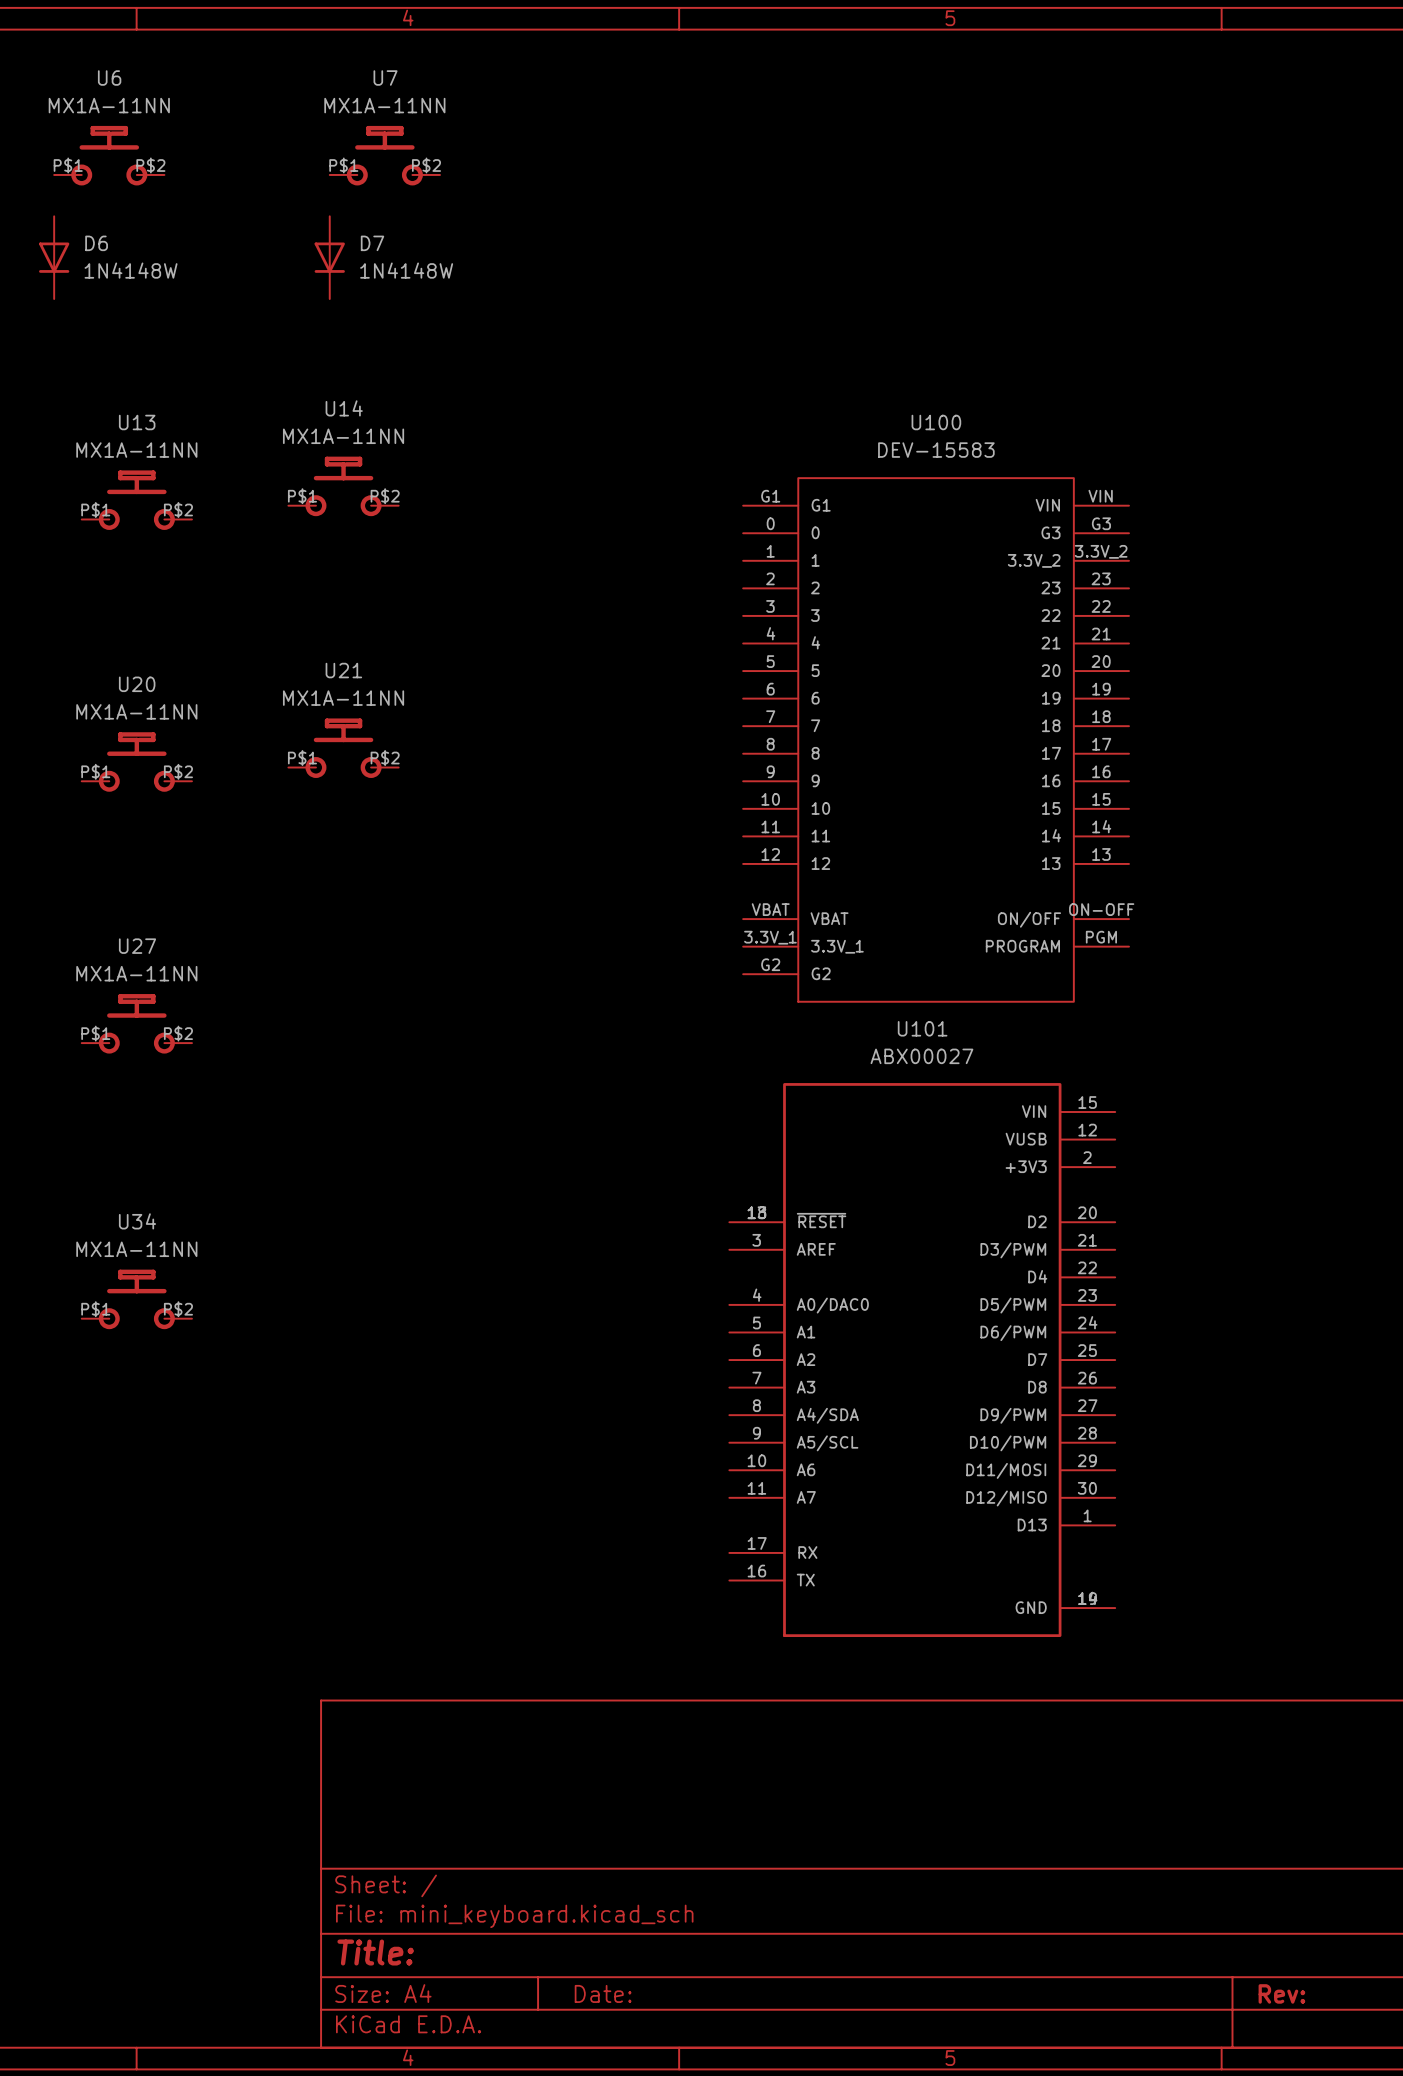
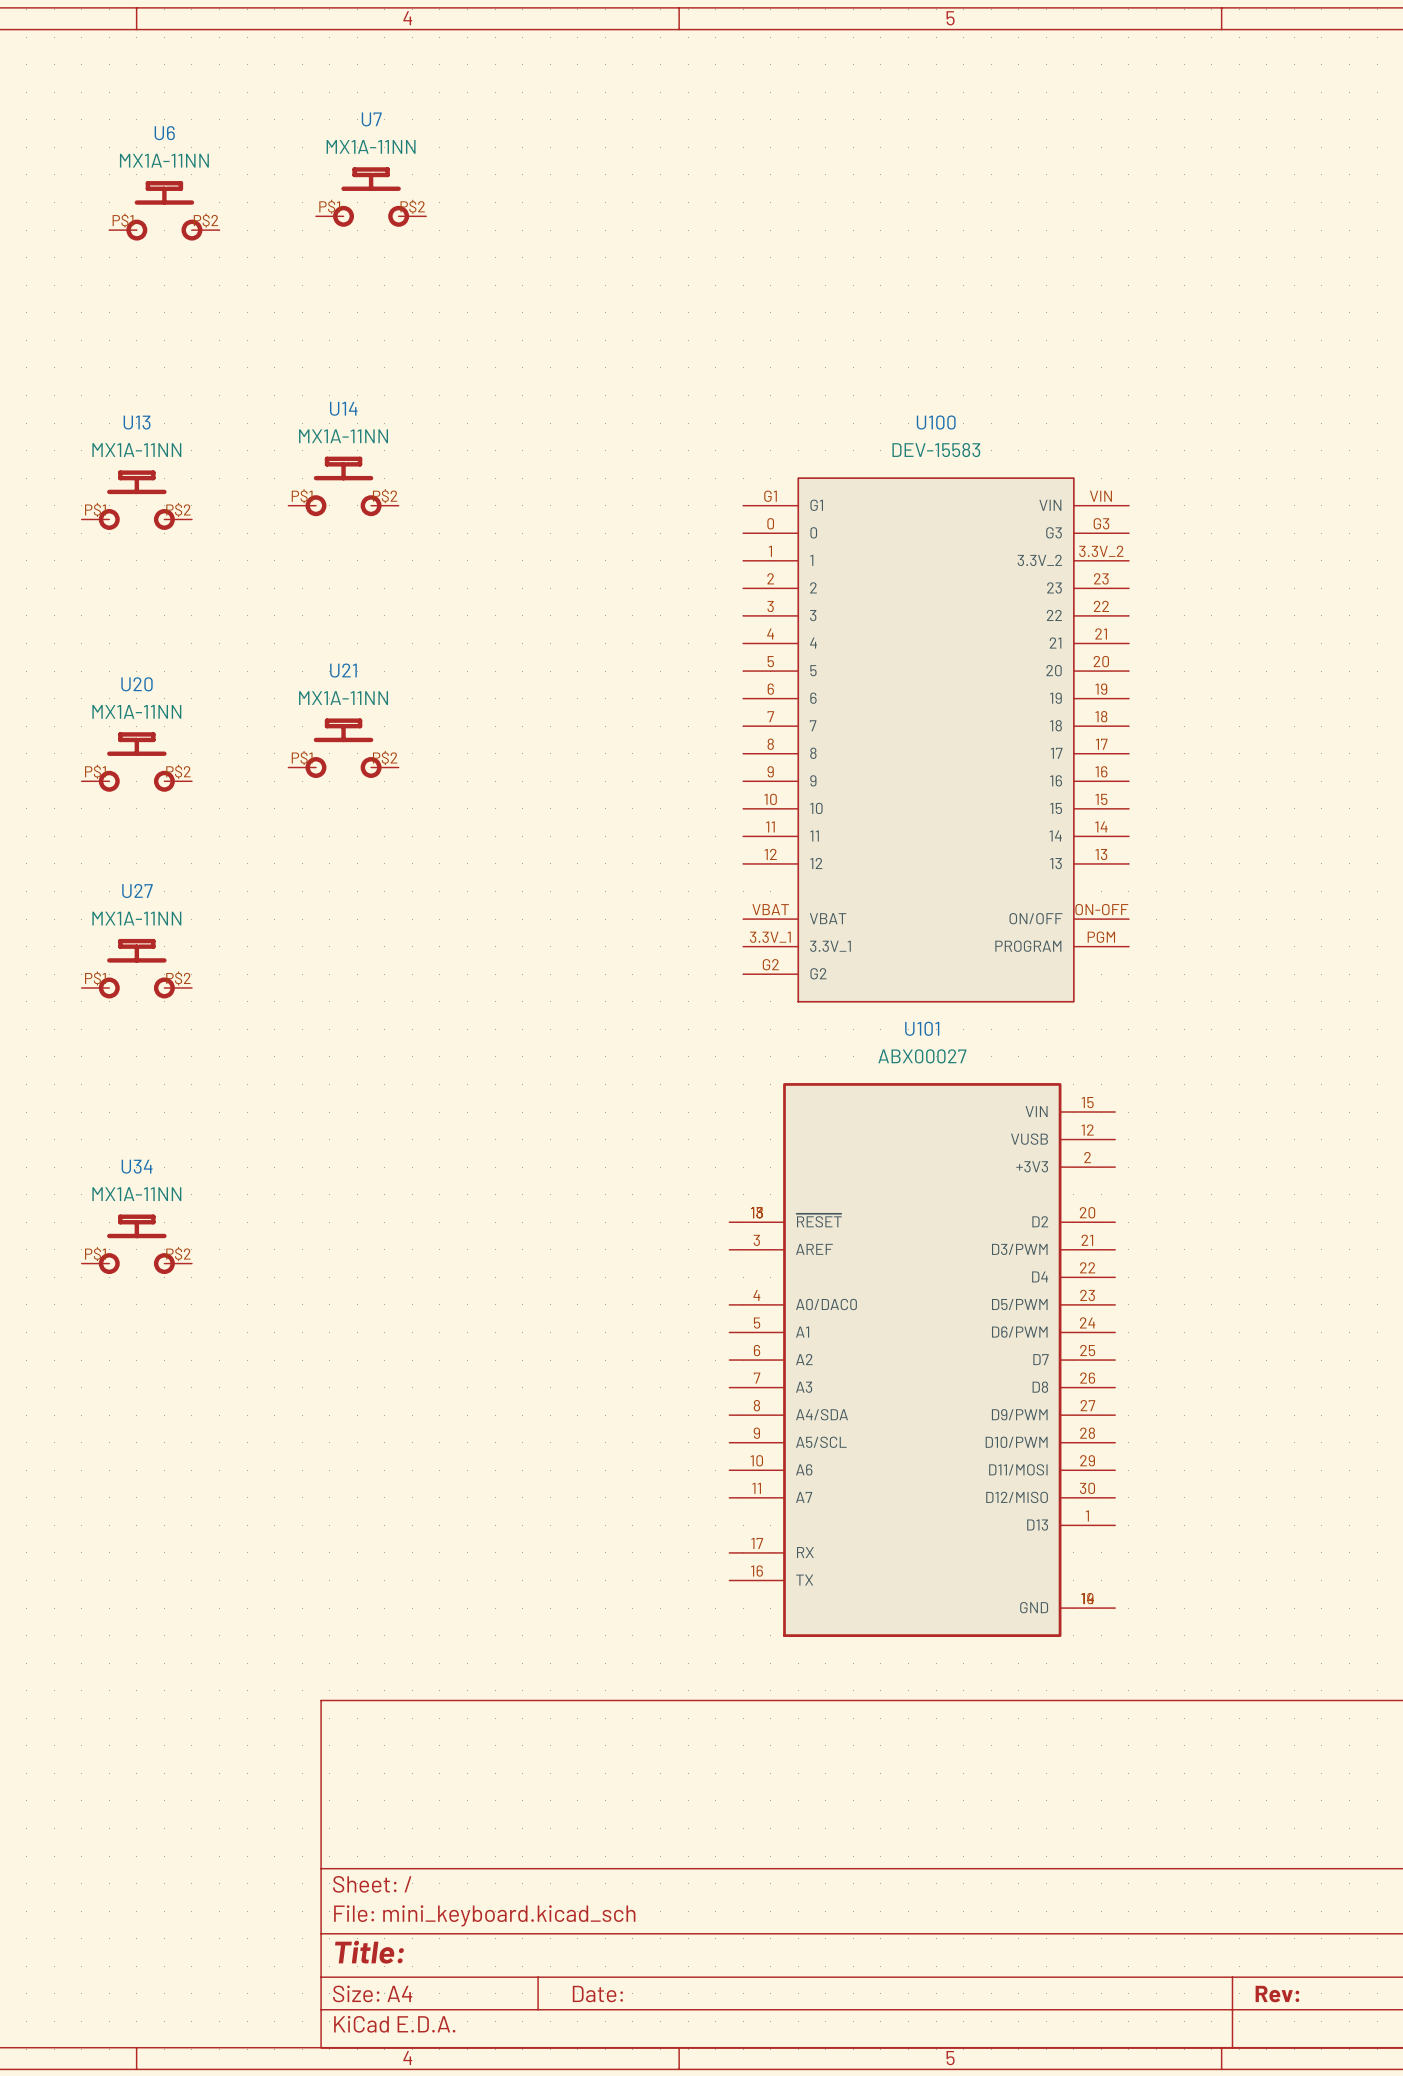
U6 position: (109, 155) -> (164, 210)
U7 position: (384, 155) -> (371, 197)
D6: 1N4148W (54, 257) -> none
D7: 1N4148W (329, 257) -> none
U27 position: (136, 1023) -> (136, 968)
U34 position: (136, 1299) -> (136, 1244)

